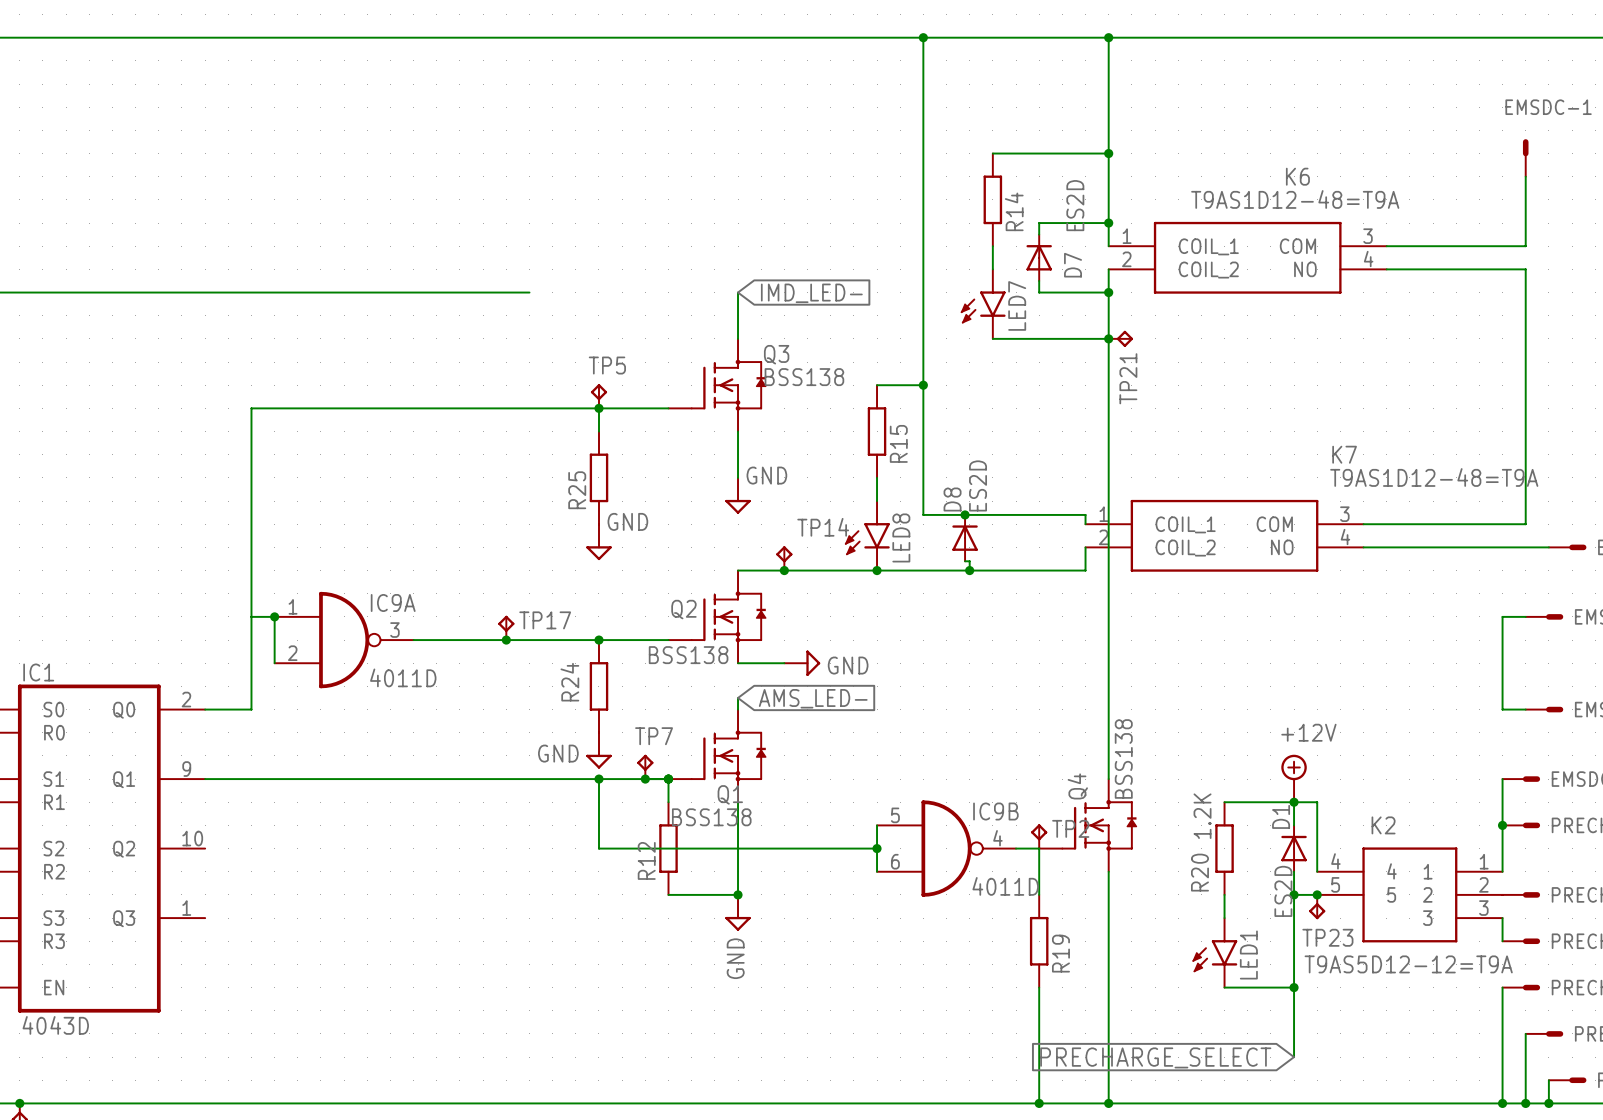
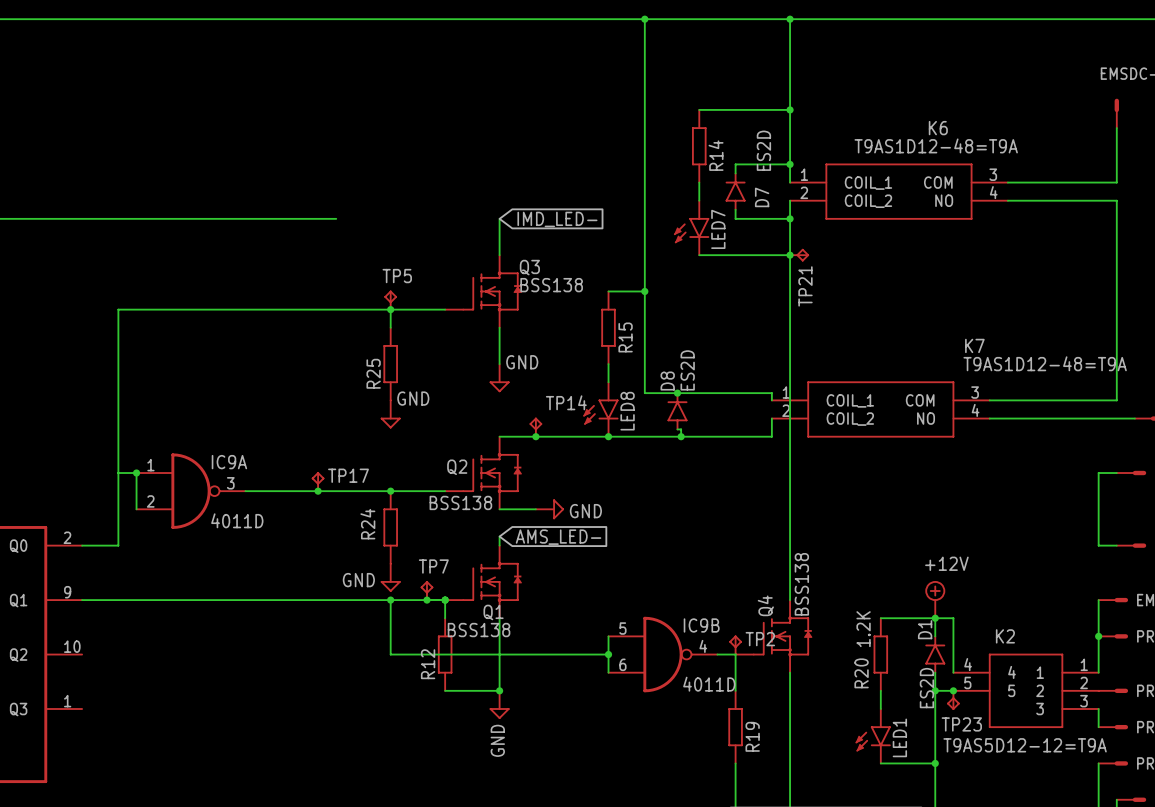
D7 symbol: [1026, 234, 1052, 281] -> [725, 172, 746, 211]
D8 symbol: [952, 514, 978, 562] -> [667, 392, 688, 431]
D1 symbol: [1281, 825, 1307, 872] -> [925, 635, 946, 674]

